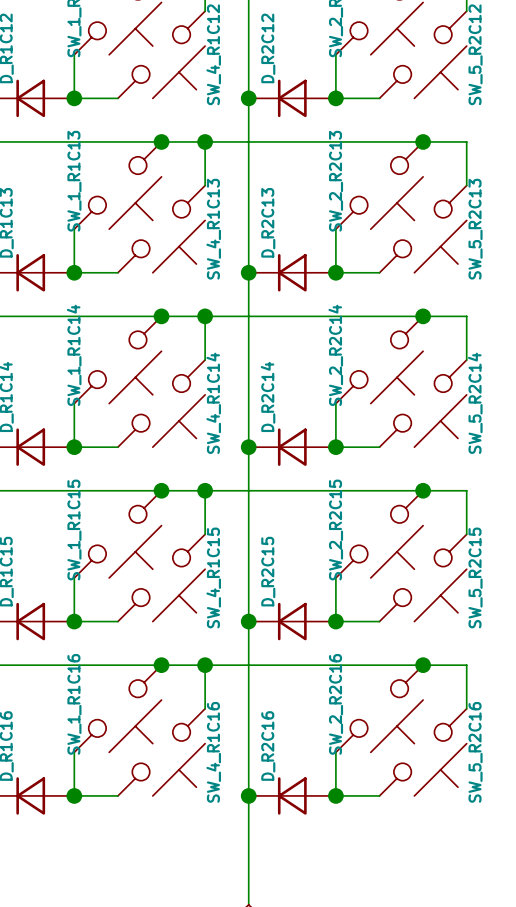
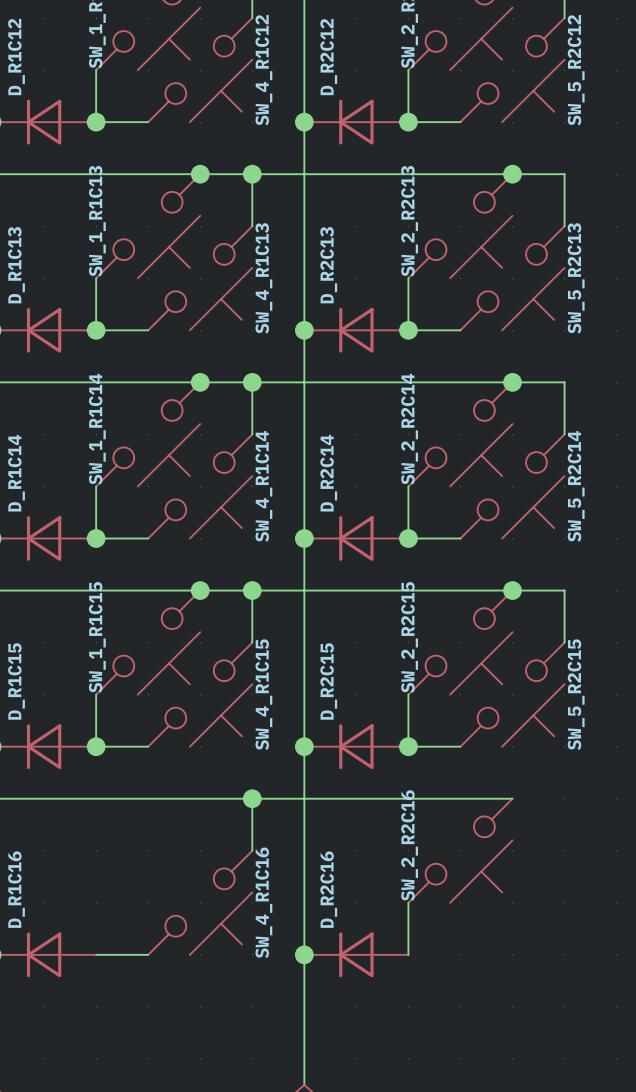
junction: (161, 665) -> none
wire: (423, 665) (466, 665) (466, 708) -> none
junction: (423, 665) -> none
SW_1_R1C16: (117, 708) -> none
wire: (74, 752) (74, 795) -> none
SW_5_R2C16: (423, 752) -> none
junction: (74, 795) -> none
wire: (335, 795) (379, 795) -> none
junction: (335, 795) -> none

